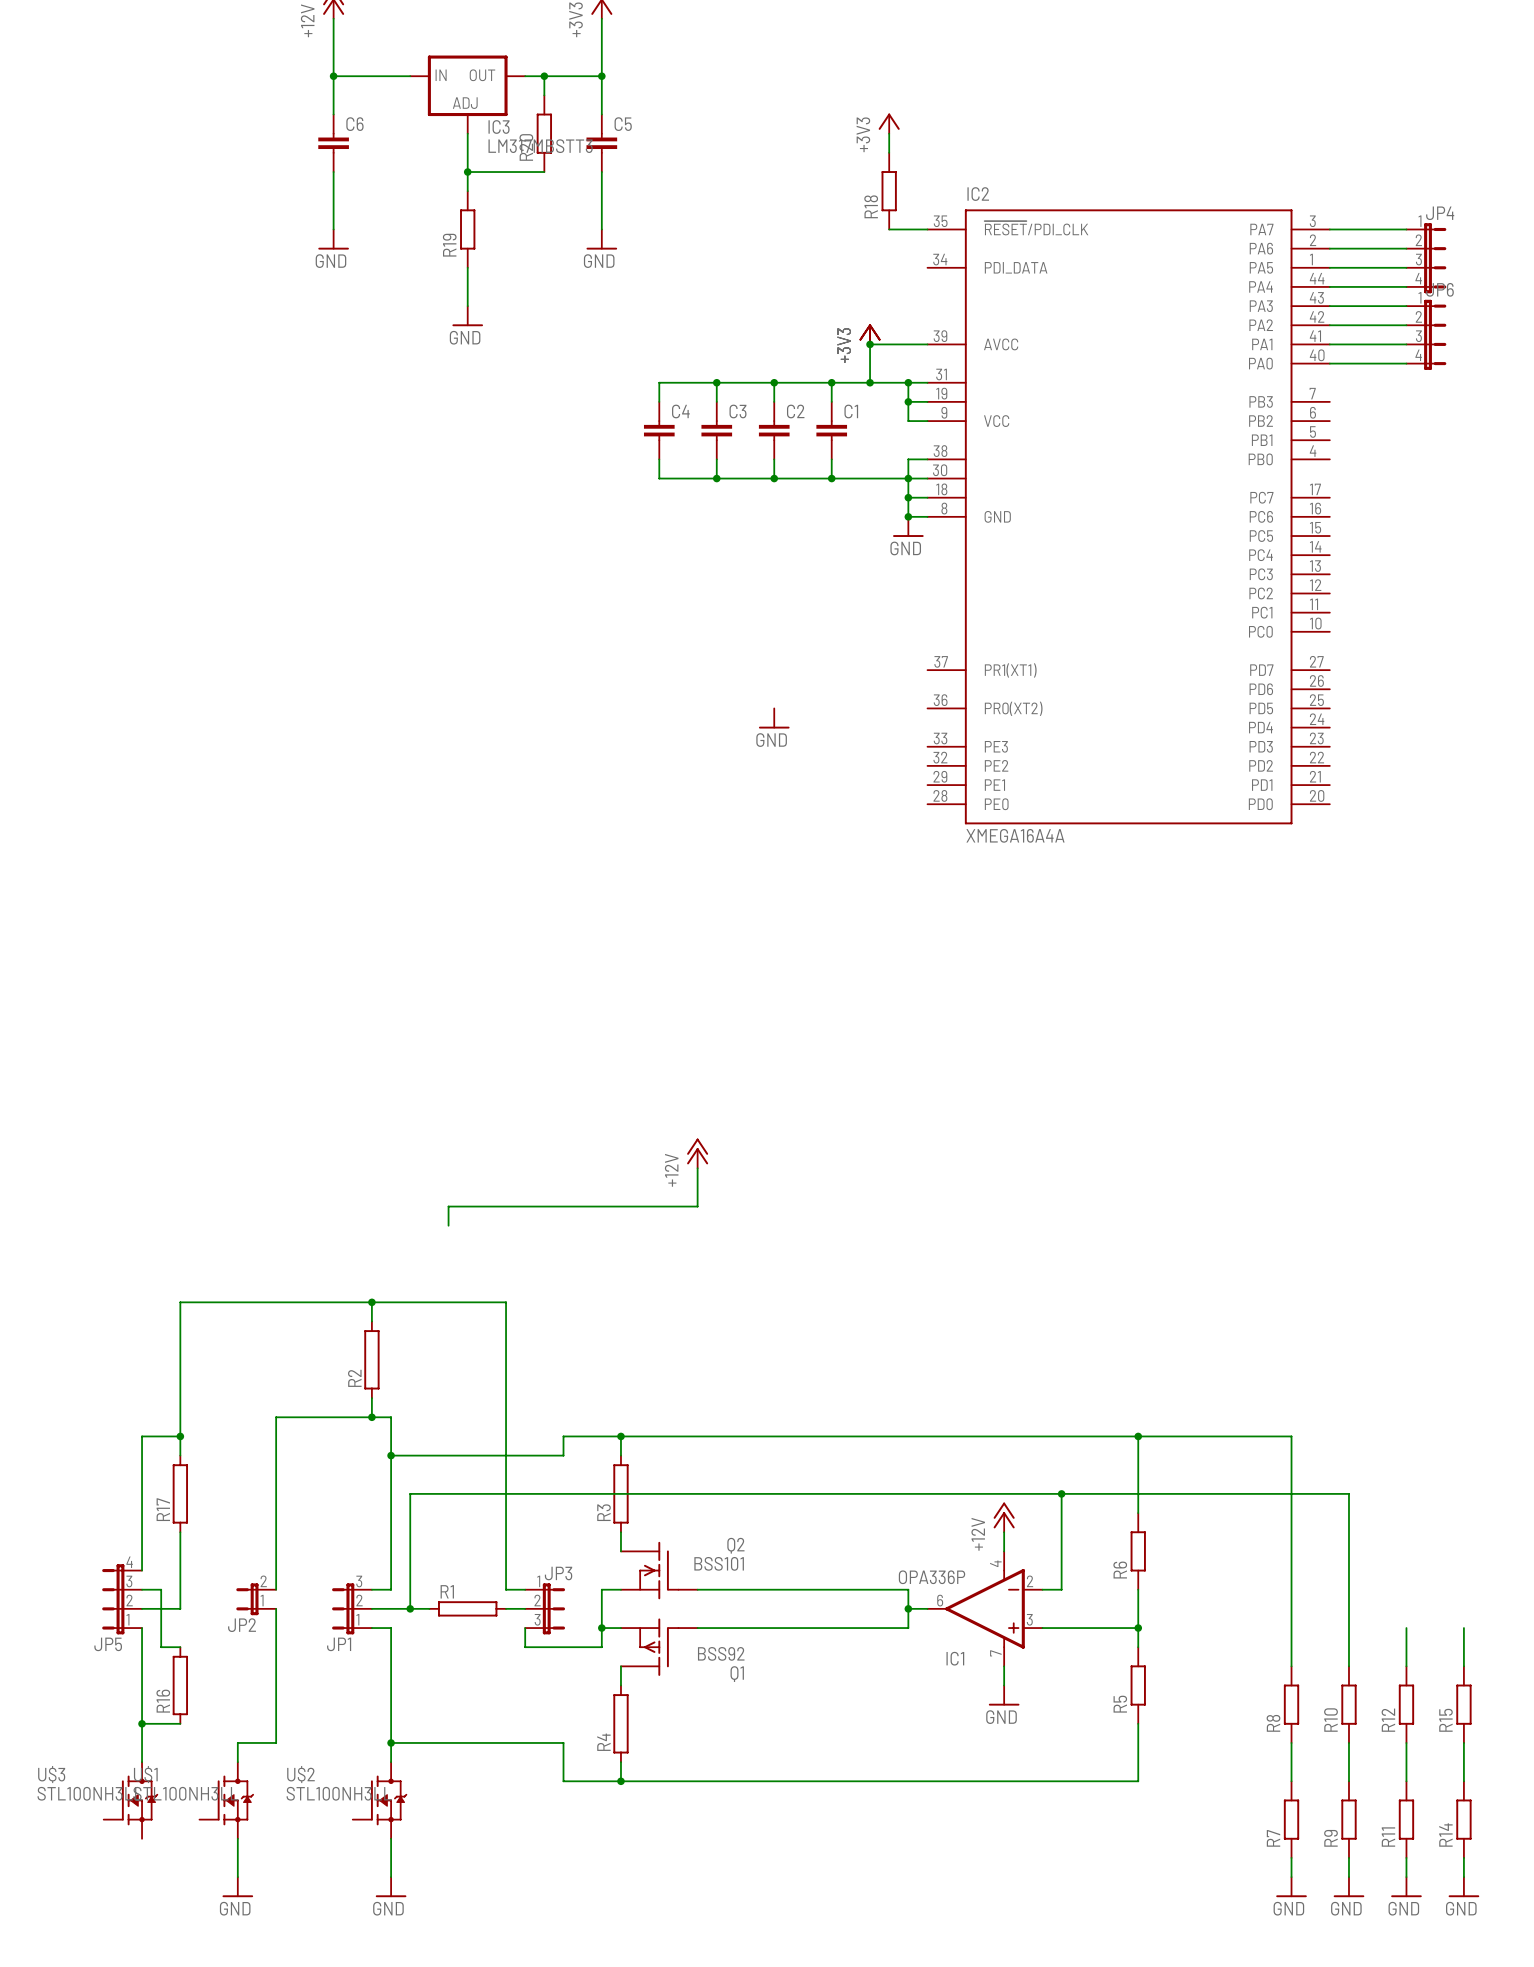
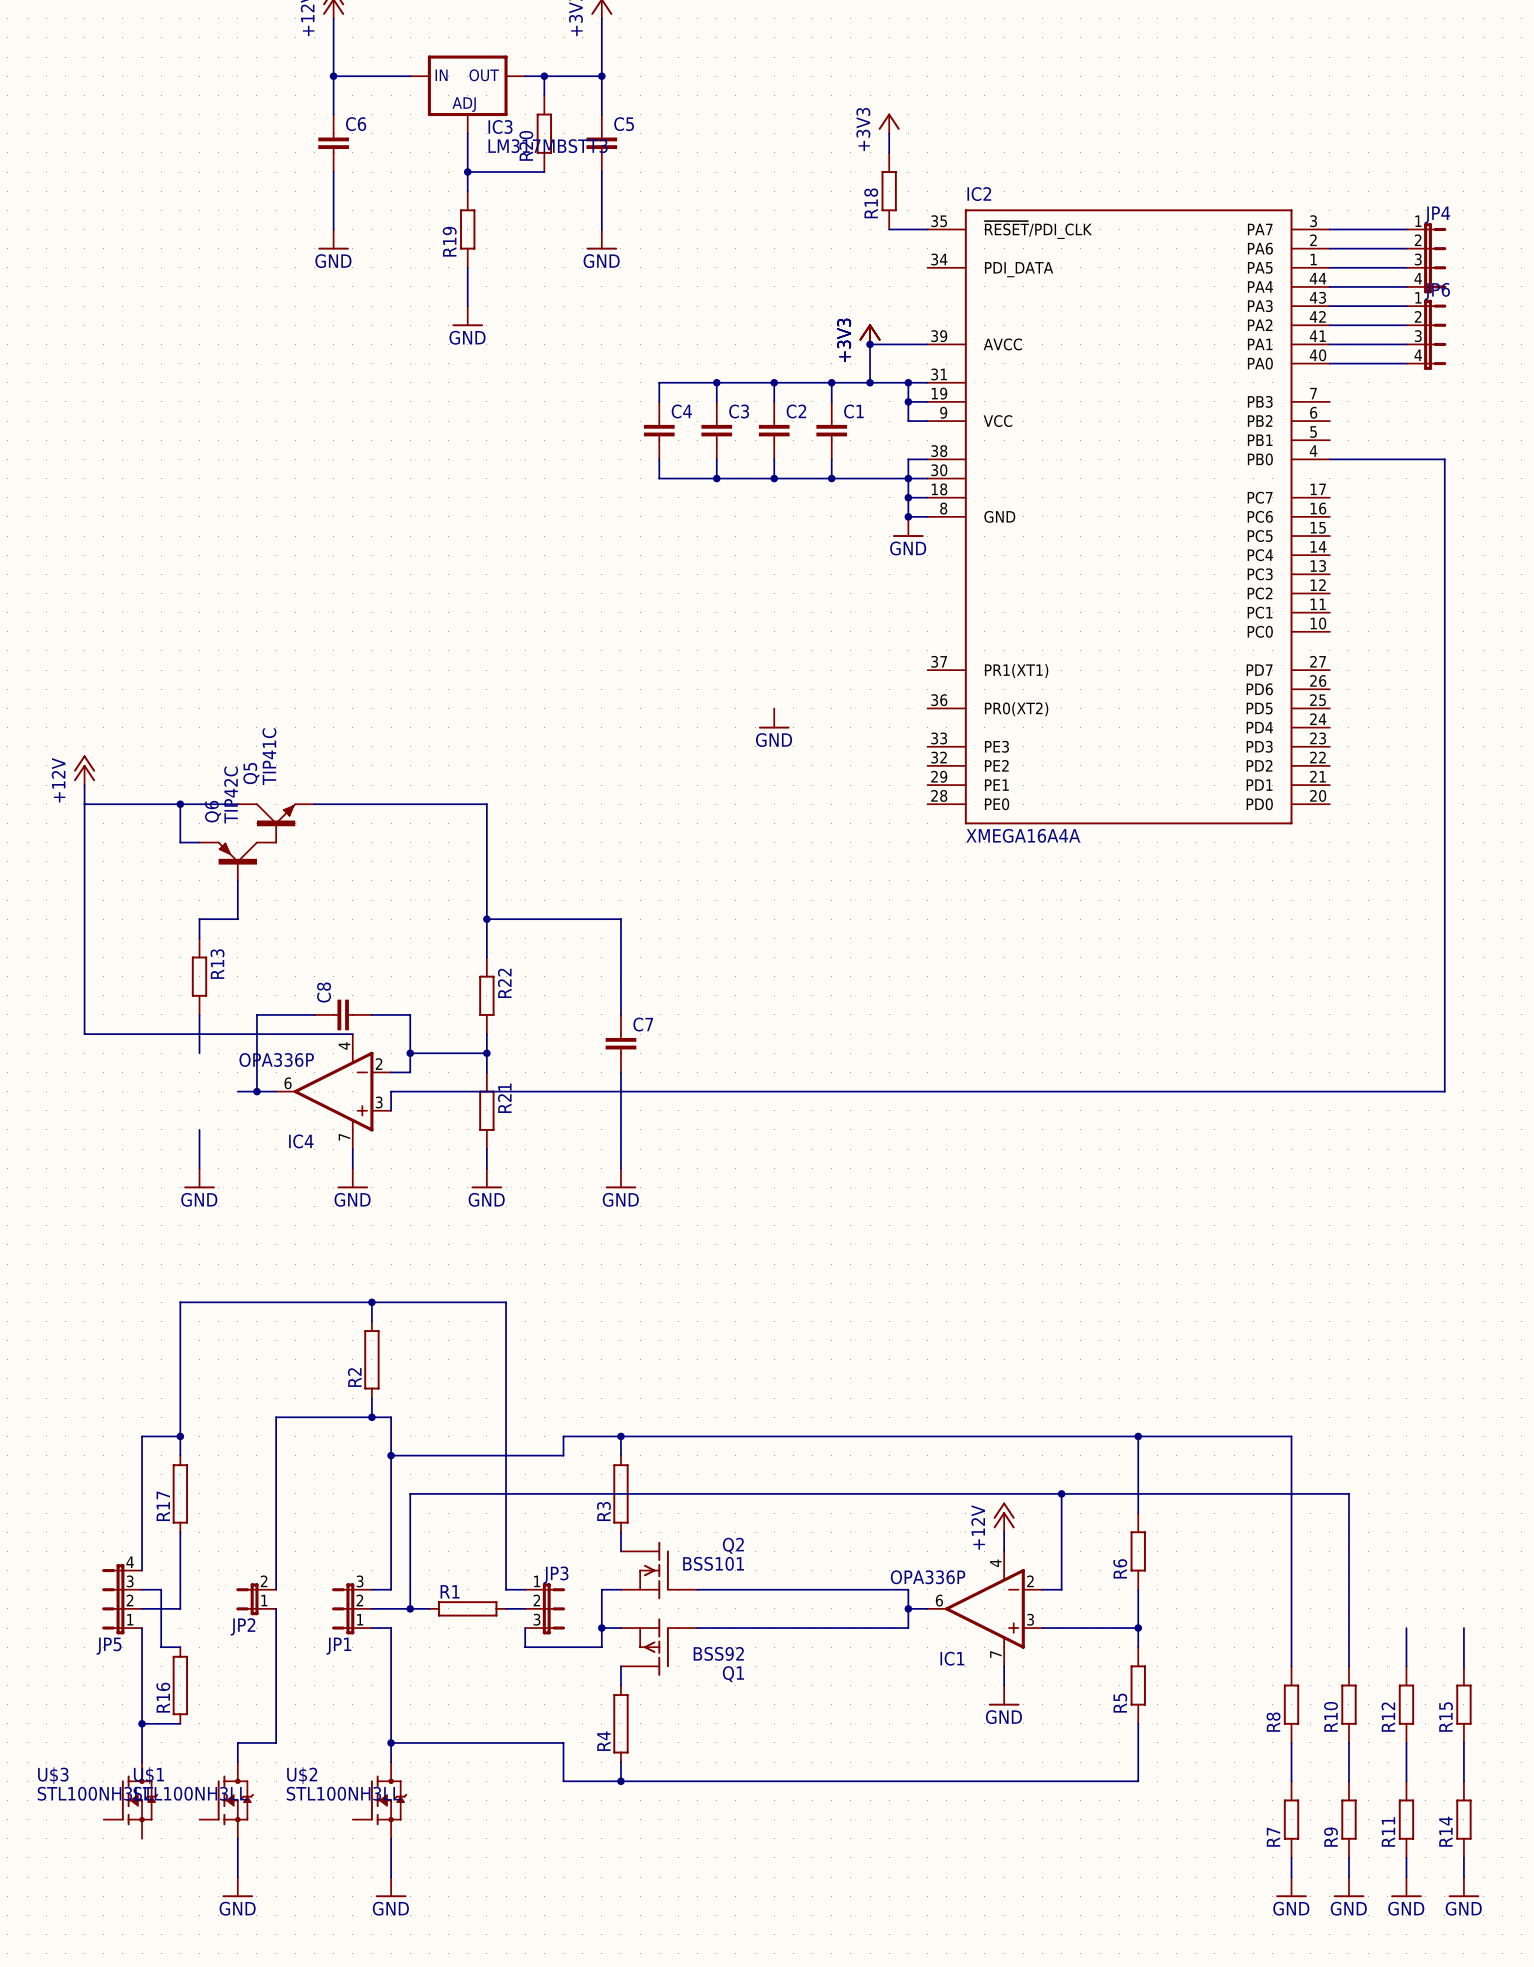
wire: none -> (1329, 459) (1444, 459) (1444, 1091) (391, 1091) (391, 1110)
power symbol: none -> +12V (84, 770)
wire: none -> (84, 785) (84, 1034) (352, 1034)
wire: none -> (84, 804) (237, 804)
wire: none -> (180, 804) (180, 842) (199, 842)
junction: none -> (180, 804)
wire: none -> (314, 804) (486, 804) (486, 957)
Q5: none -> TIP41C (276, 823)
Q6: none -> TIP42C (237, 861)
wire: none -> (237, 880) (237, 919) (199, 919) (199, 938)
wire: none -> (486, 919) (620, 919) (620, 1014)
junction: none -> (486, 919)
R13: none -> (199, 976)
R22: none -> (486, 995)
wire: none -> (199, 1014) (199, 1053)
wire: none -> (314, 1014) (256, 1014) (256, 1091)
C8: none -> (343, 1014)
wire: none -> (371, 1014) (410, 1014) (410, 1072) (391, 1072)
wire: none -> (486, 1034) (486, 1072)
C7: none -> (620, 1043)
wire: none -> (410, 1053) (486, 1053)
junction: none -> (410, 1053)
junction: none -> (486, 1053)
wire: none -> (620, 1072) (620, 1168)
wire: none -> (237, 1091) (276, 1091)
junction: none -> (256, 1091)
IC4: none -> OPA336P (333, 1091)
R21: none -> (486, 1110)
wire: none -> (199, 1129) (199, 1168)
wire: none -> (352, 1149) (352, 1168)
wire: none -> (486, 1149) (486, 1168)
power symbol: +12V (697, 1153) -> none
wire: (697, 1168) (697, 1206) (448, 1206) (448, 1225) -> none
power symbol: none -> GND (199, 1178)
power symbol: none -> GND (352, 1178)
power symbol: none -> GND (486, 1178)
power symbol: none -> GND (620, 1178)

